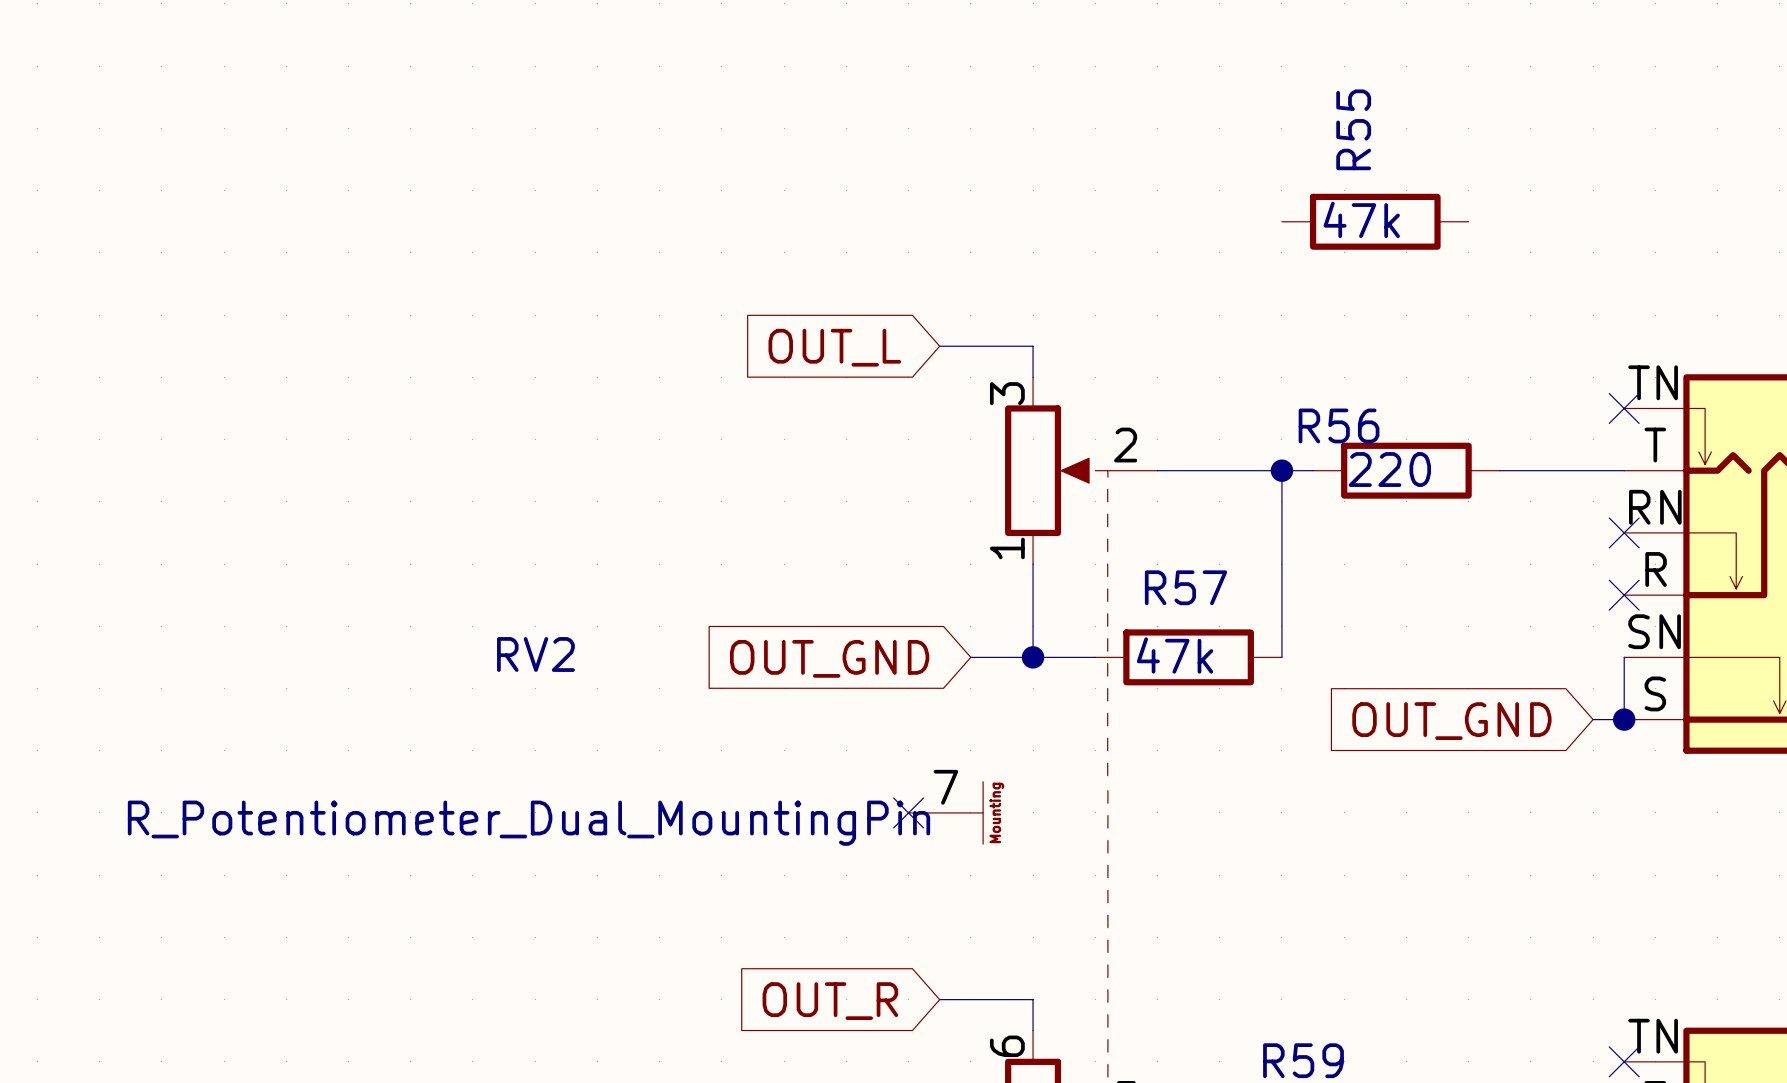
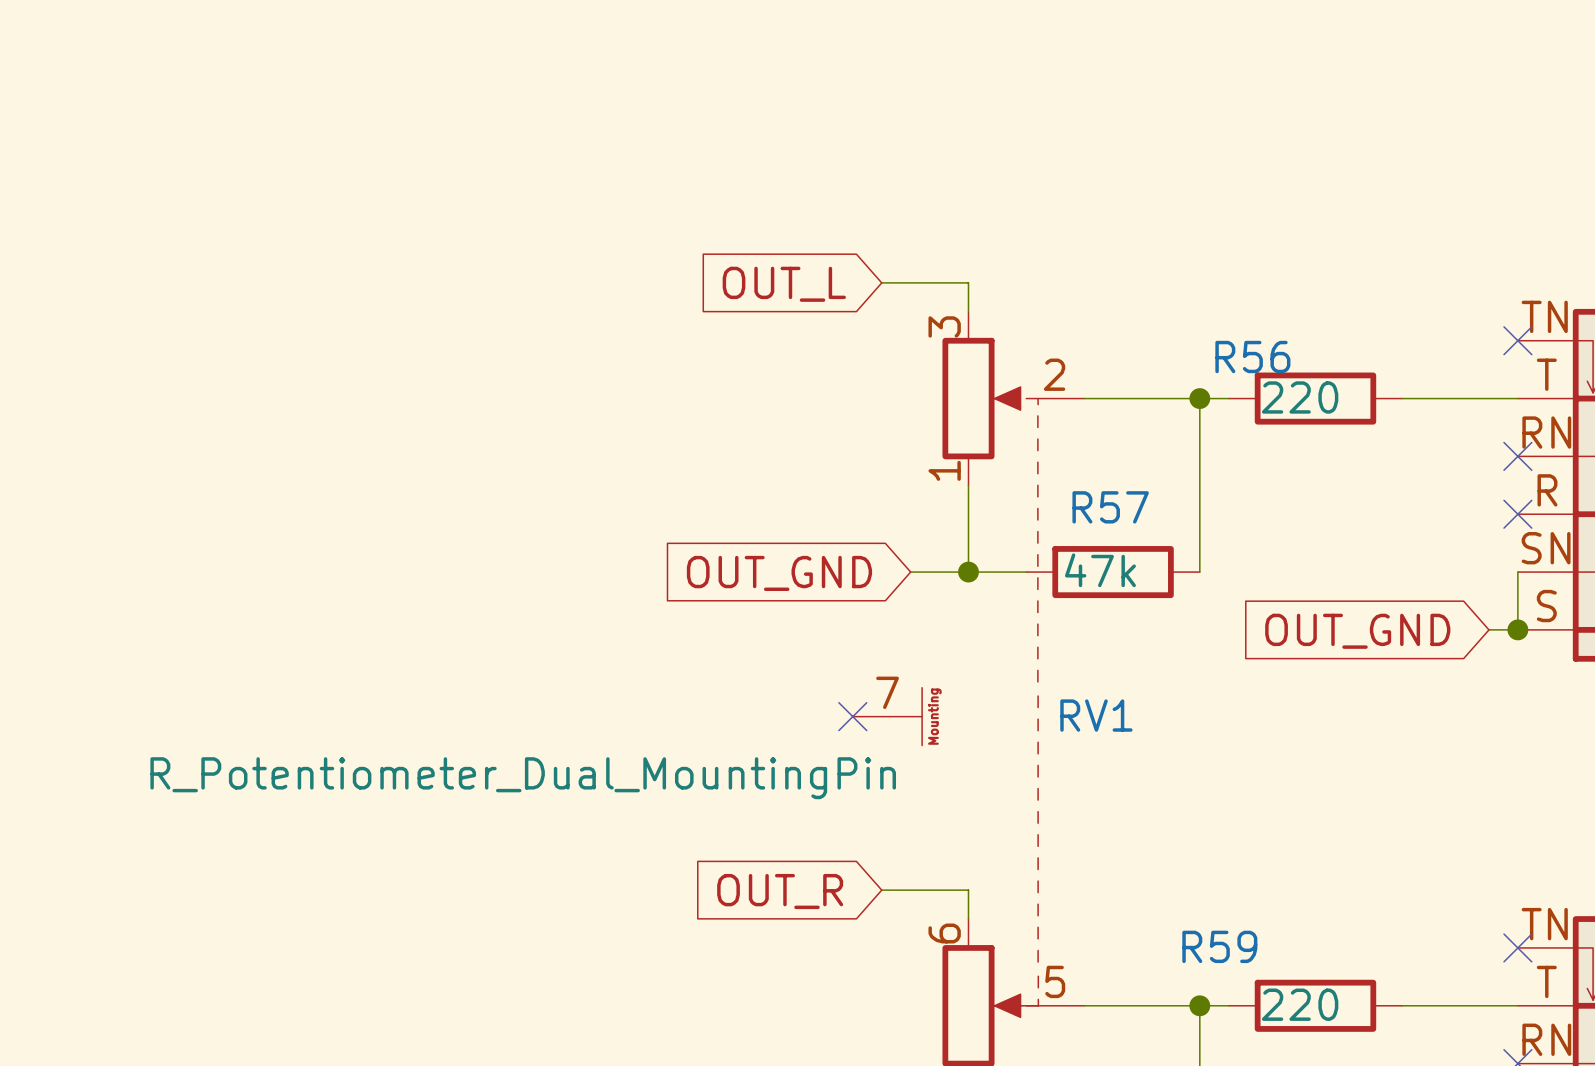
R55: 47k (1375, 221) -> none
RV2 name: RV2 (535, 654) -> RV1 (1096, 715)
RV2 value position: R_Potentiometer_Dual_MountingPin (528, 823) -> R_Potentiometer_Dual_MountingPin (523, 778)

